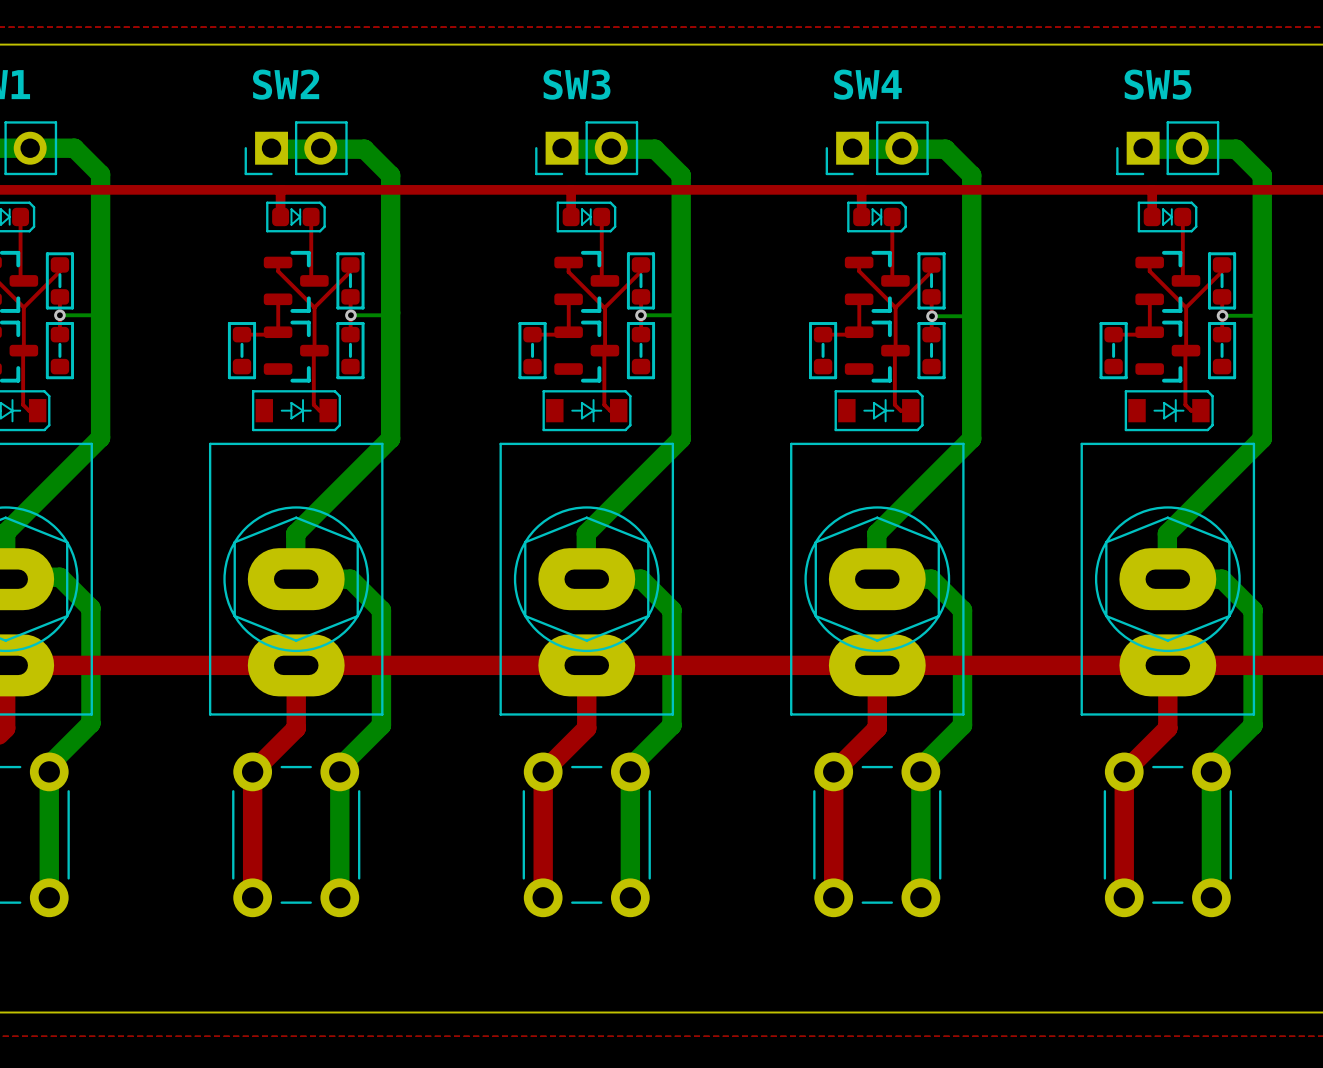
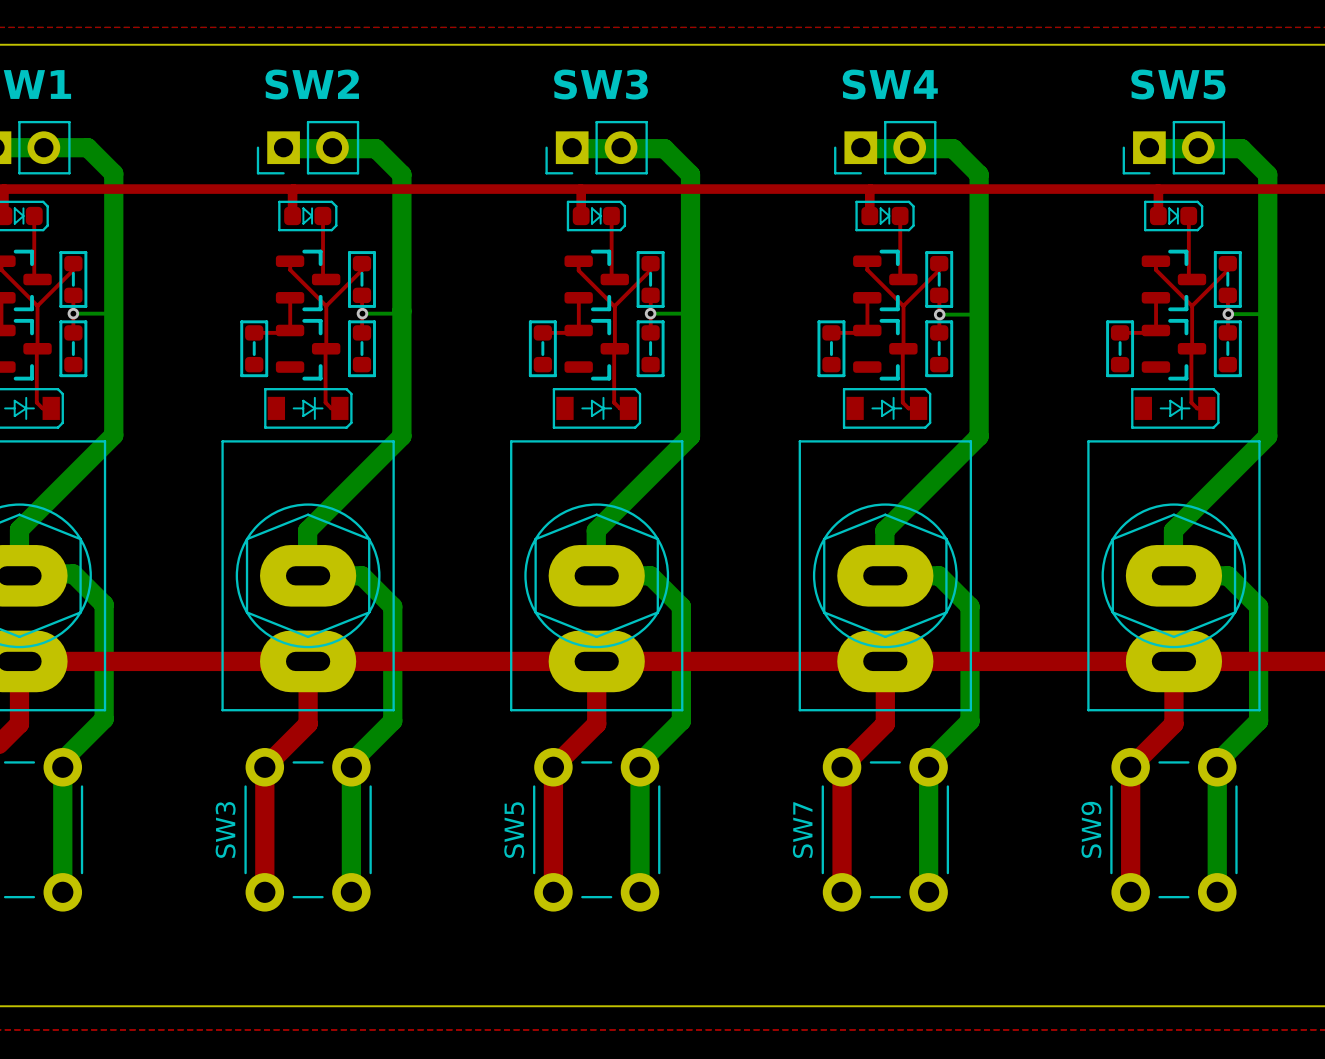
SW3 name: none -> SW3 (225, 829)
SW7 name: none -> SW7 (802, 830)
SW9 name: none -> SW9 (1091, 829)
SW5 name: none -> SW5 (514, 830)

